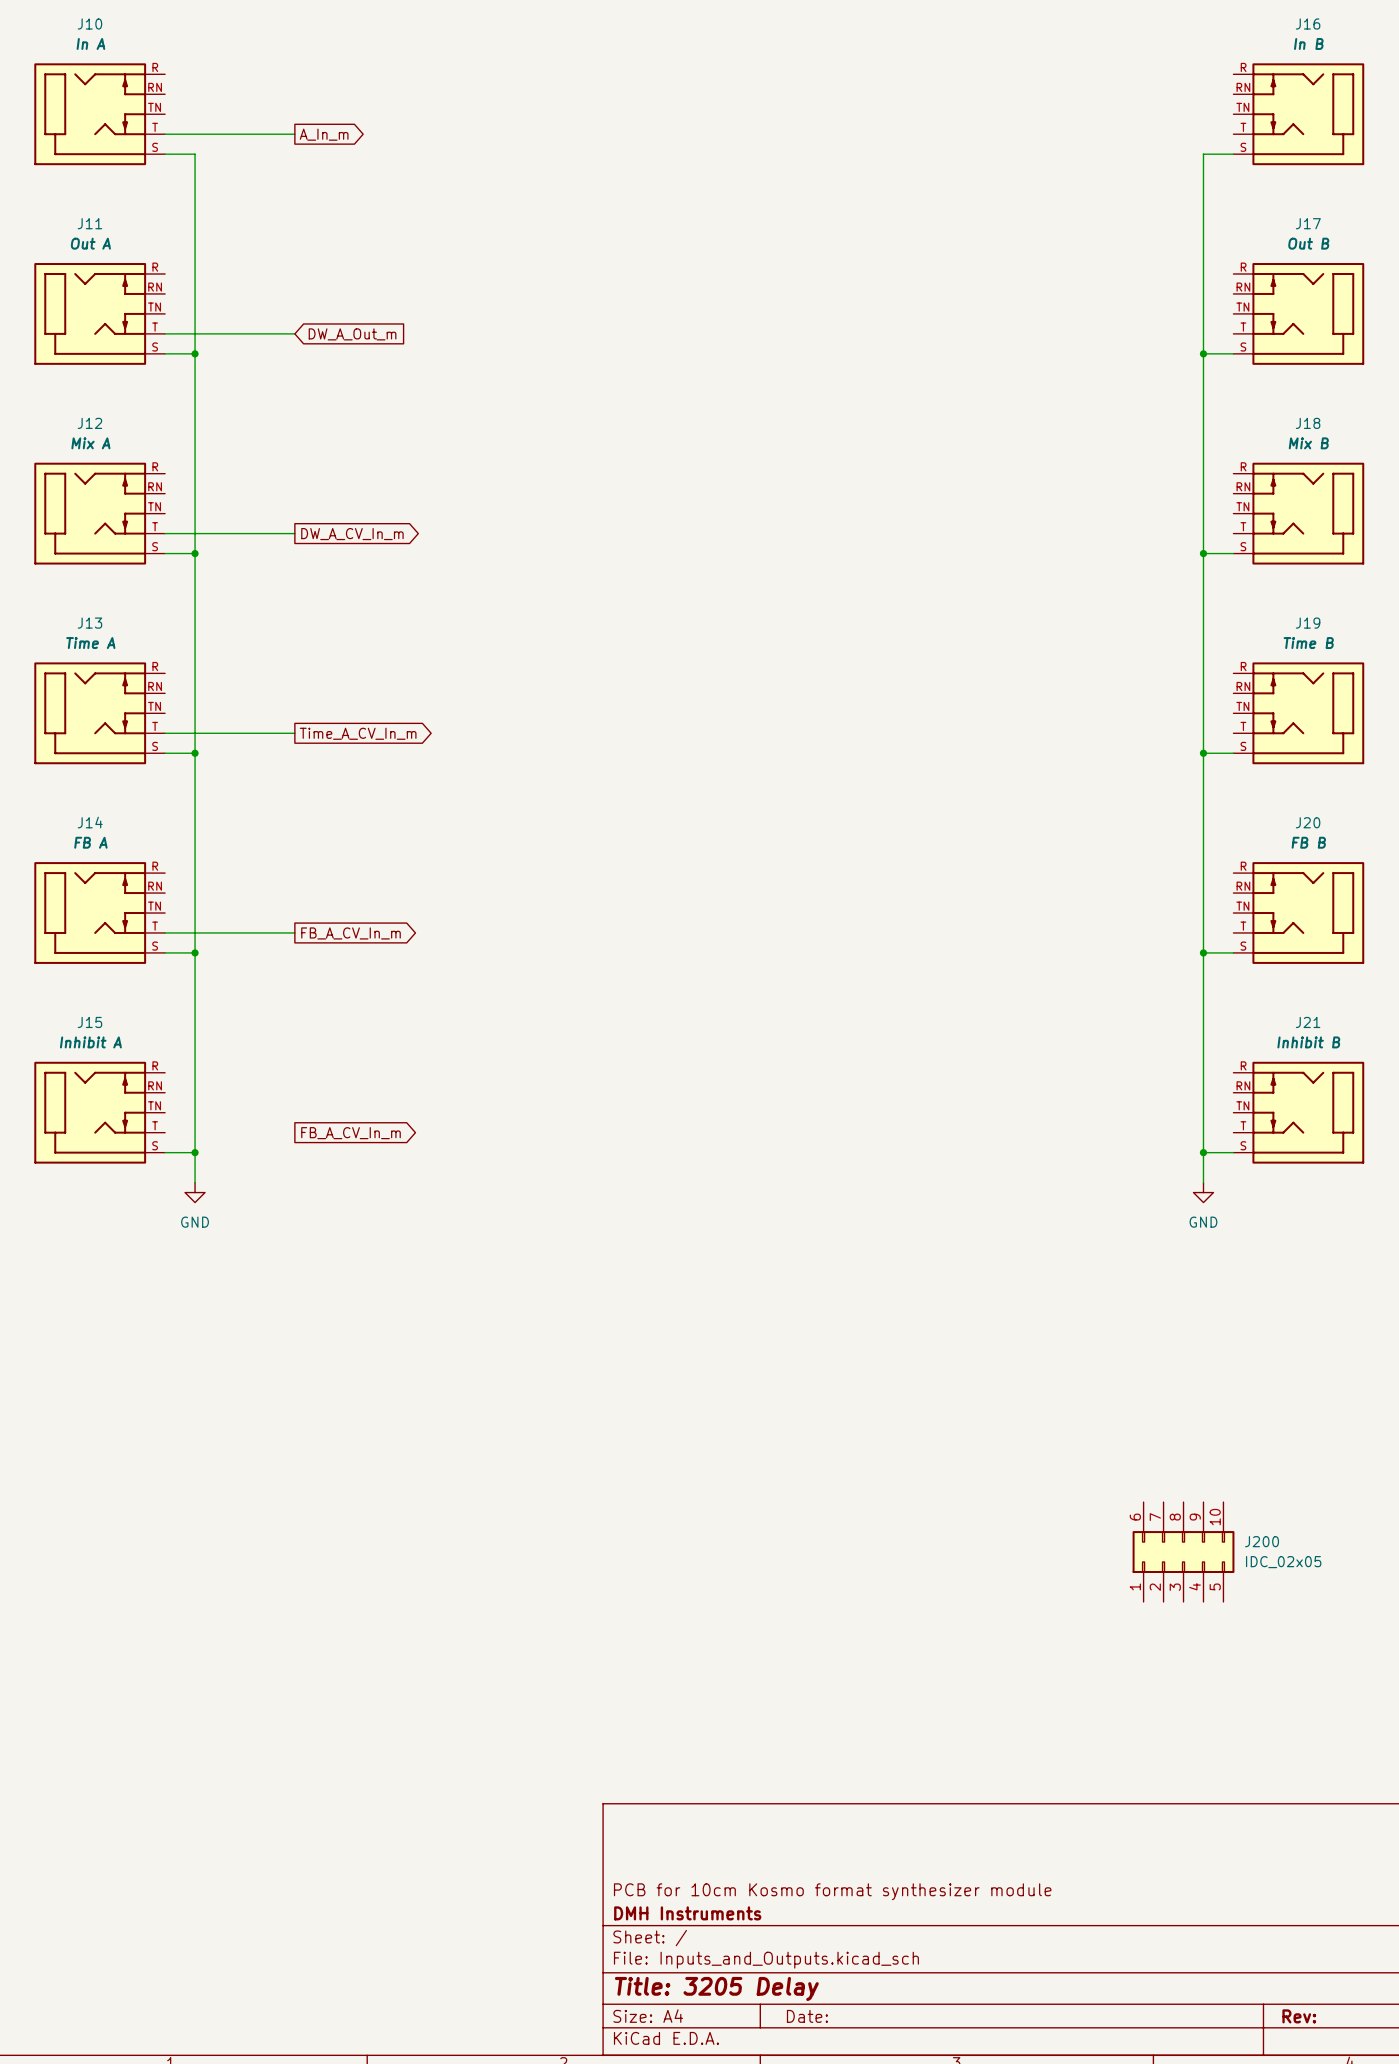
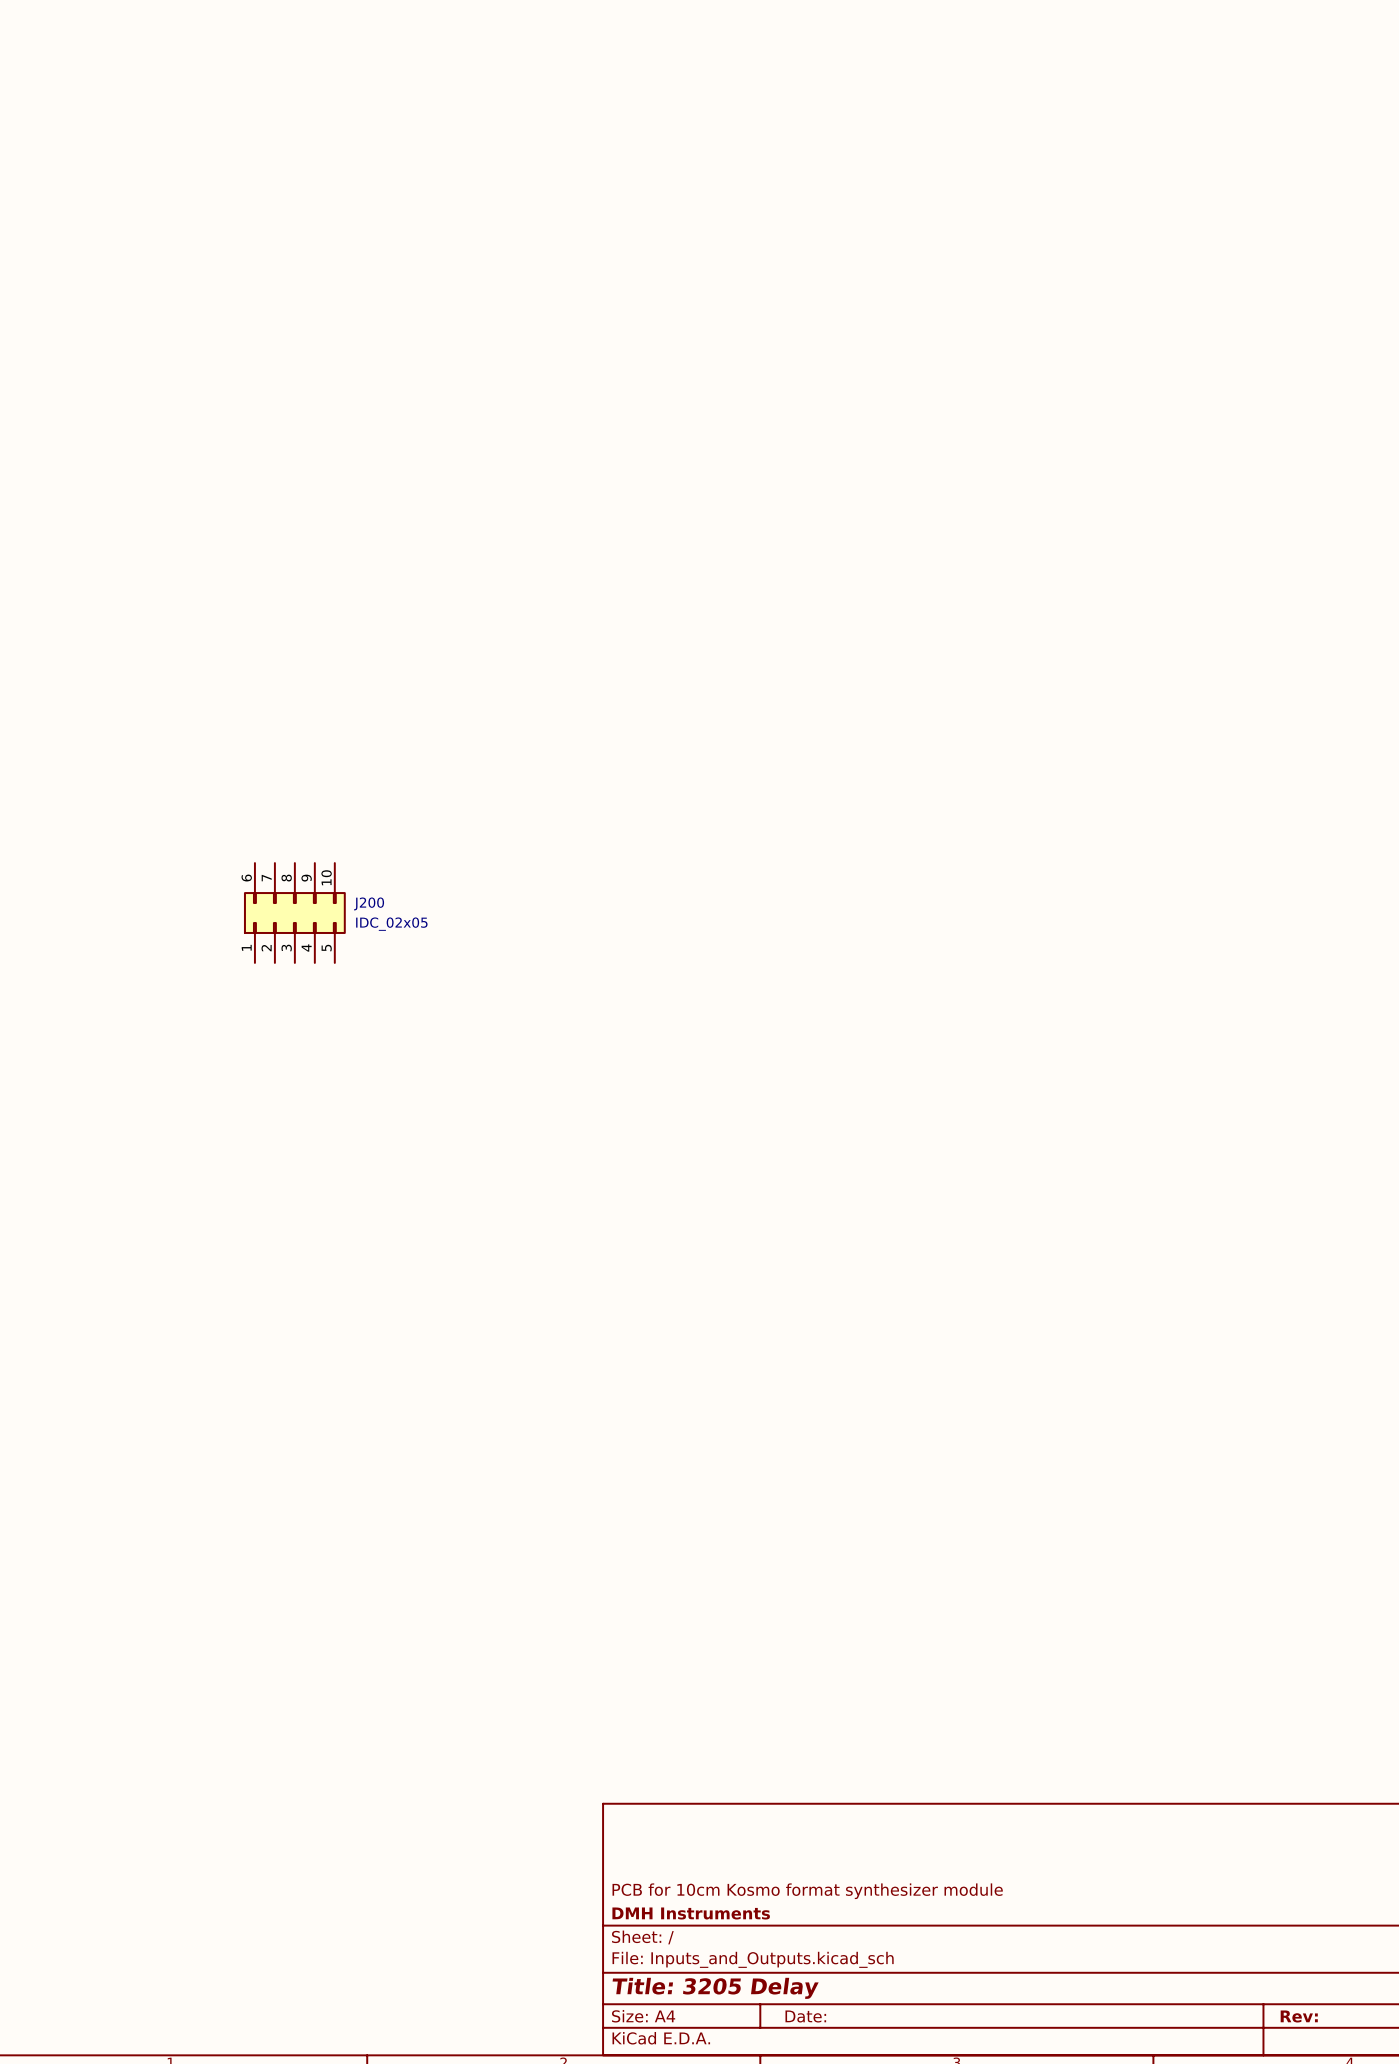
J10: (99, 114) -> none
J16: (1298, 114) -> none
wire: (165, 134) (294, 134) -> none
global label: A_In_m (324, 134) -> none
wire: (165, 154) (195, 154) (195, 1182) -> none
wire: (1233, 154) (1203, 154) (1203, 1182) -> none
J11: (99, 313) -> none
J17: (1298, 313) -> none
wire: (165, 333) (294, 333) -> none
global label: DW_A_Out_m (352, 334) -> none
wire: (165, 353) (195, 353) -> none
junction: (195, 353) -> none
wire: (1203, 353) (1233, 353) -> none
junction: (1203, 353) -> none
J12: (99, 513) -> none
J18: (1298, 513) -> none
wire: (165, 533) (294, 533) -> none
global label: DW_A_CV_In_m (352, 534) -> none
wire: (165, 553) (195, 553) -> none
junction: (195, 553) -> none
wire: (1203, 553) (1233, 553) -> none
junction: (1203, 553) -> none
J13: (99, 713) -> none
J19: (1298, 713) -> none
wire: (165, 733) (294, 733) -> none
global label: Time_A_CV_In_m (358, 733) -> none
wire: (165, 753) (195, 753) -> none
junction: (195, 753) -> none
wire: (1203, 753) (1233, 753) -> none
junction: (1203, 753) -> none
J14: (99, 913) -> none
J20: (1298, 913) -> none
wire: (165, 932) (294, 932) -> none
global label: FB_A_CV_In_m (351, 933) -> none
wire: (165, 952) (195, 952) -> none
junction: (195, 952) -> none
wire: (1203, 952) (1233, 952) -> none
junction: (1203, 952) -> none
J15: (99, 1112) -> none
J21: (1298, 1112) -> none
global label: FB_A_CV_In_m (351, 1133) -> none
wire: (165, 1152) (195, 1152) -> none
junction: (195, 1152) -> none
wire: (1203, 1152) (1233, 1152) -> none
junction: (1203, 1152) -> none
power symbol: GND (195, 1192) -> none
power symbol: GND (1203, 1192) -> none
J200 position: (1183, 1552) -> (294, 913)

